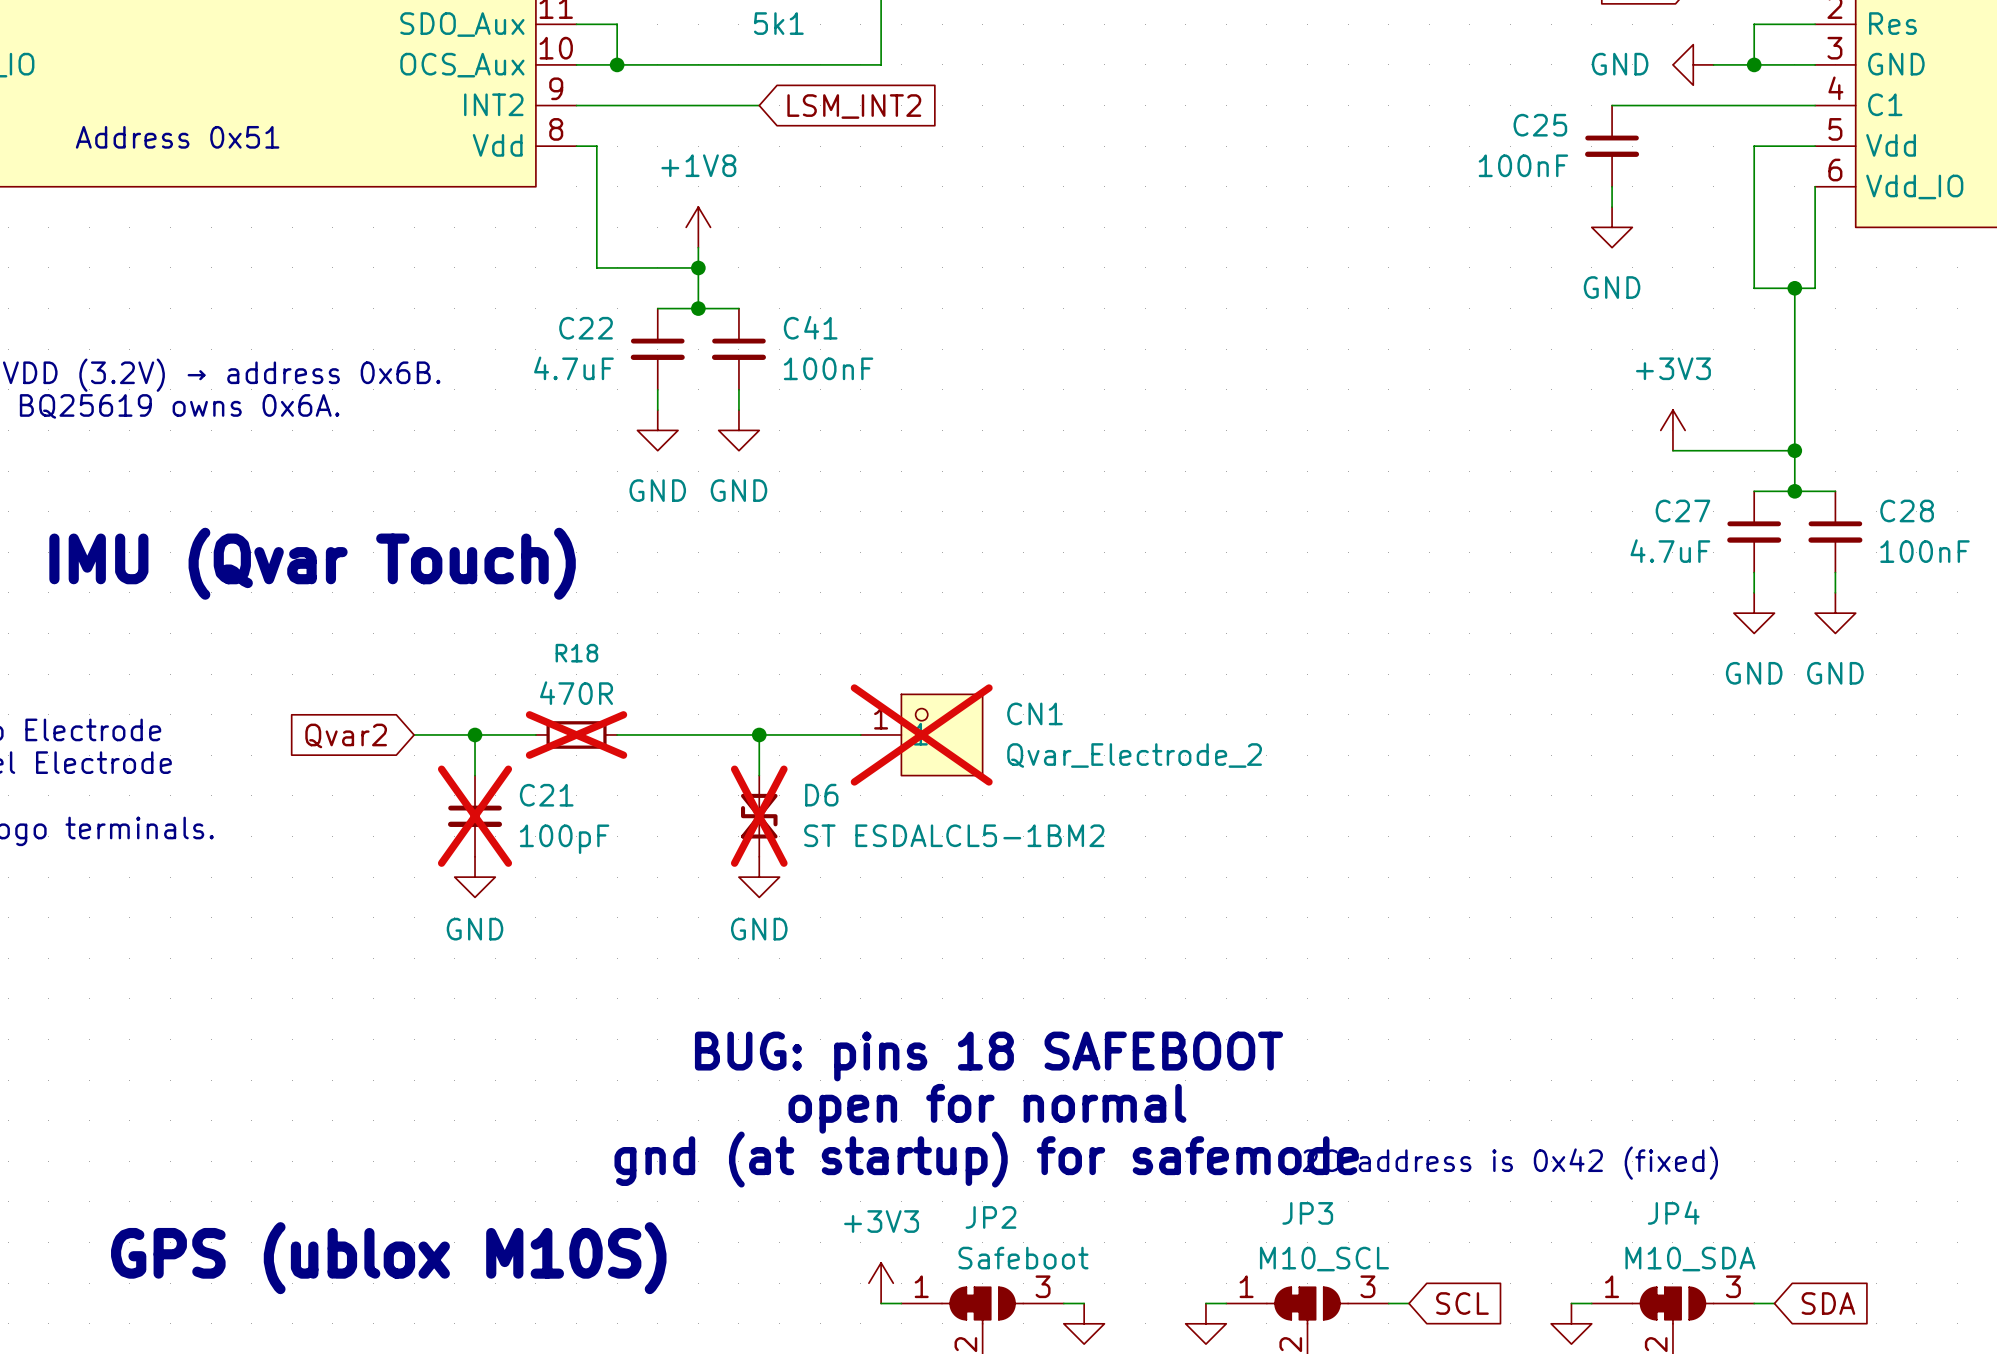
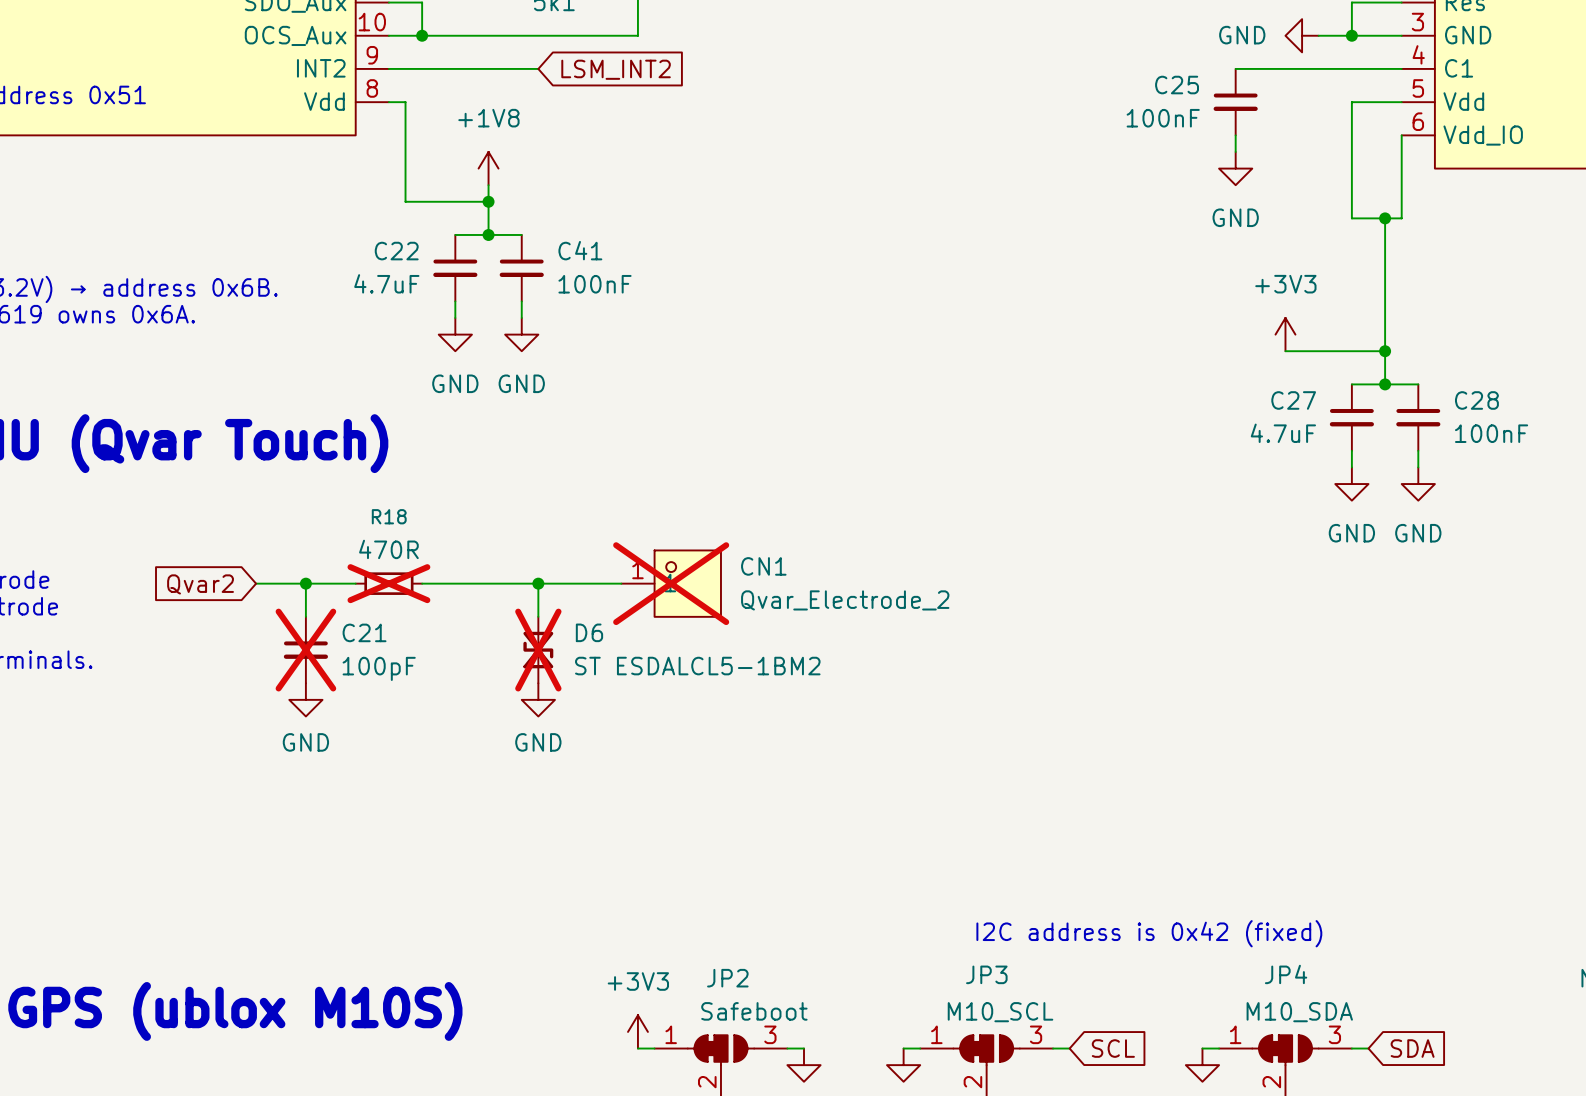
text: BUG: pins 18 SAFEBOOT (989, 1056) -> none
text: open for normal (987, 1108) -> none
text: gnd (at startup) for safemode (986, 1159) -> none

